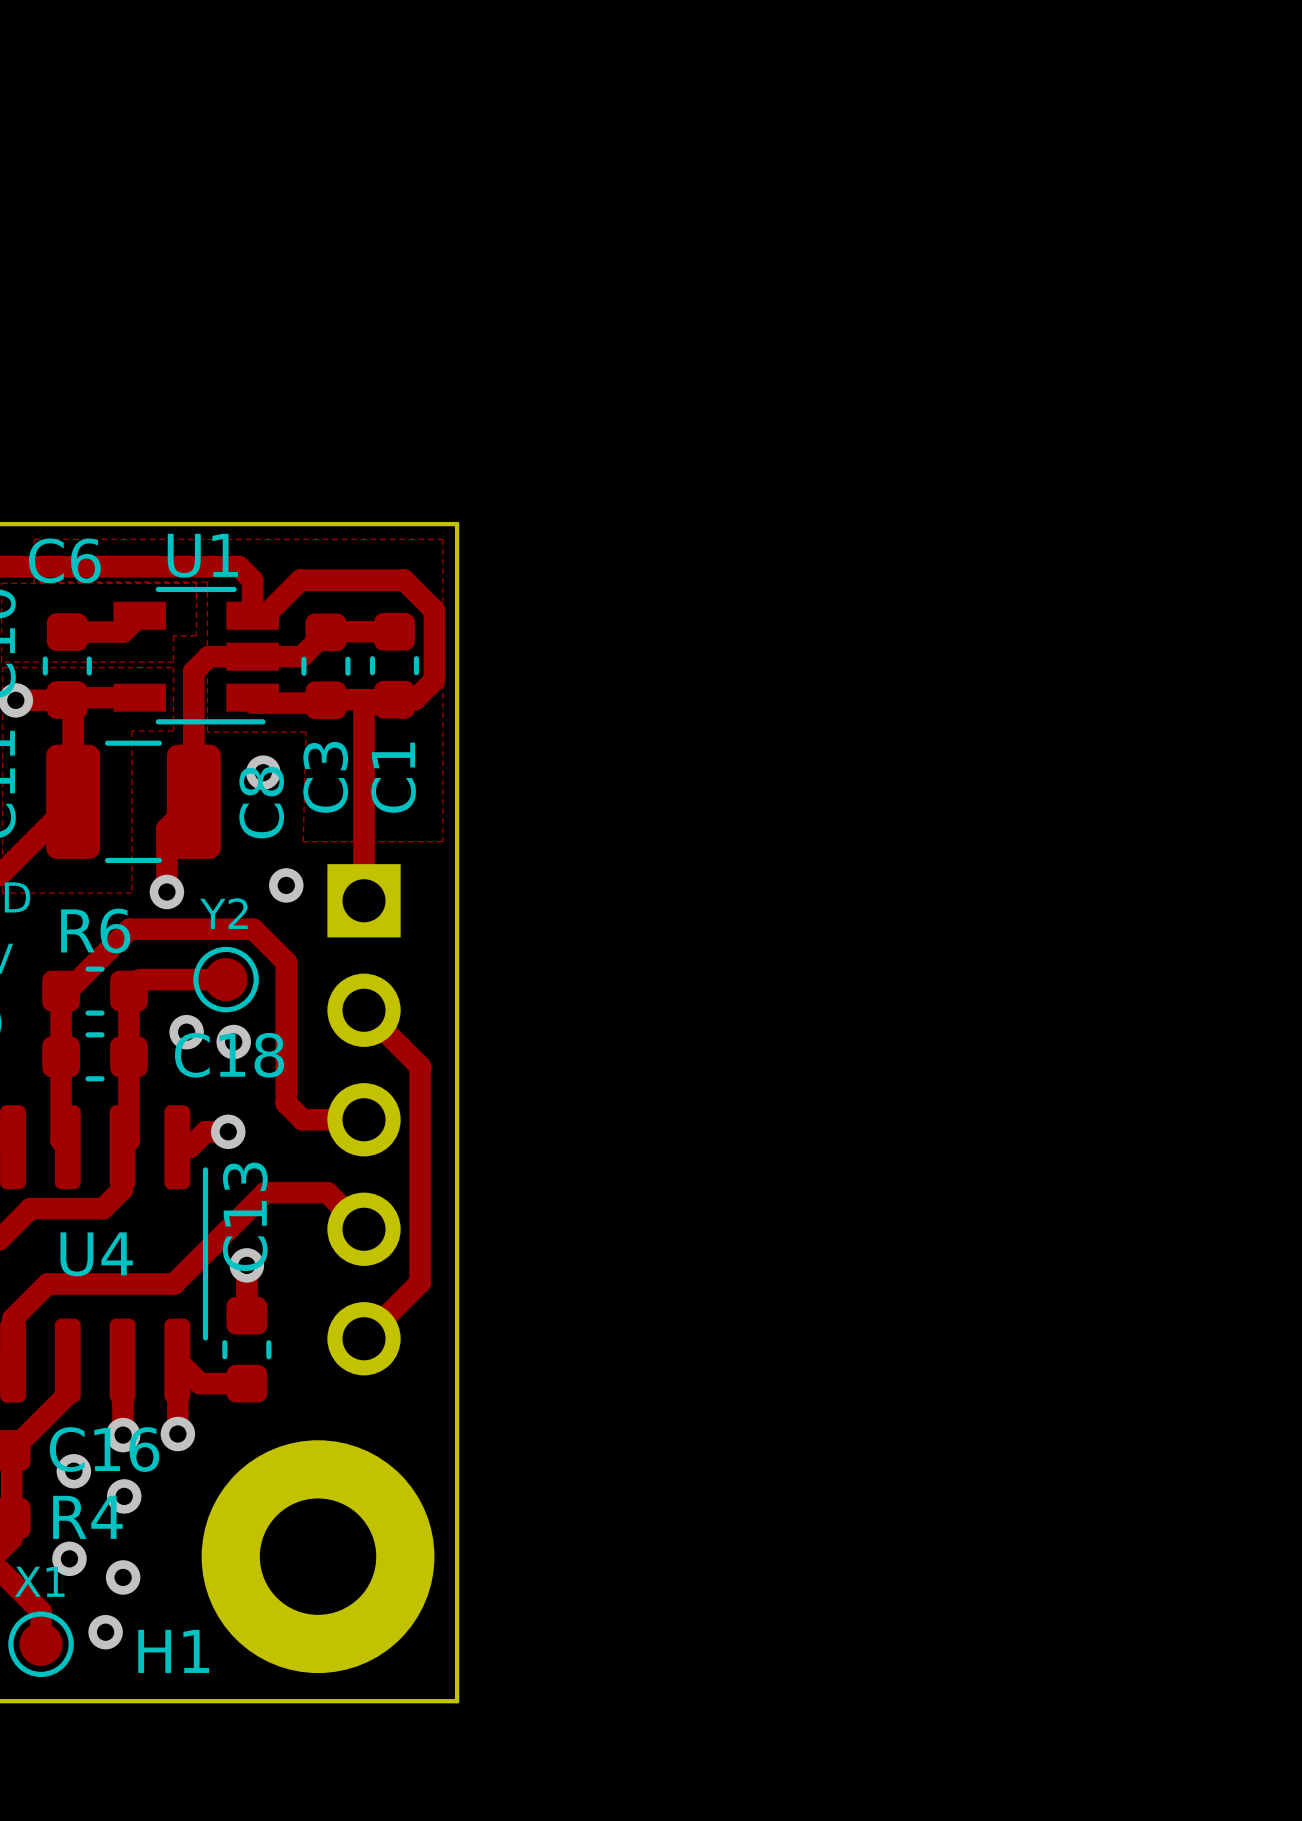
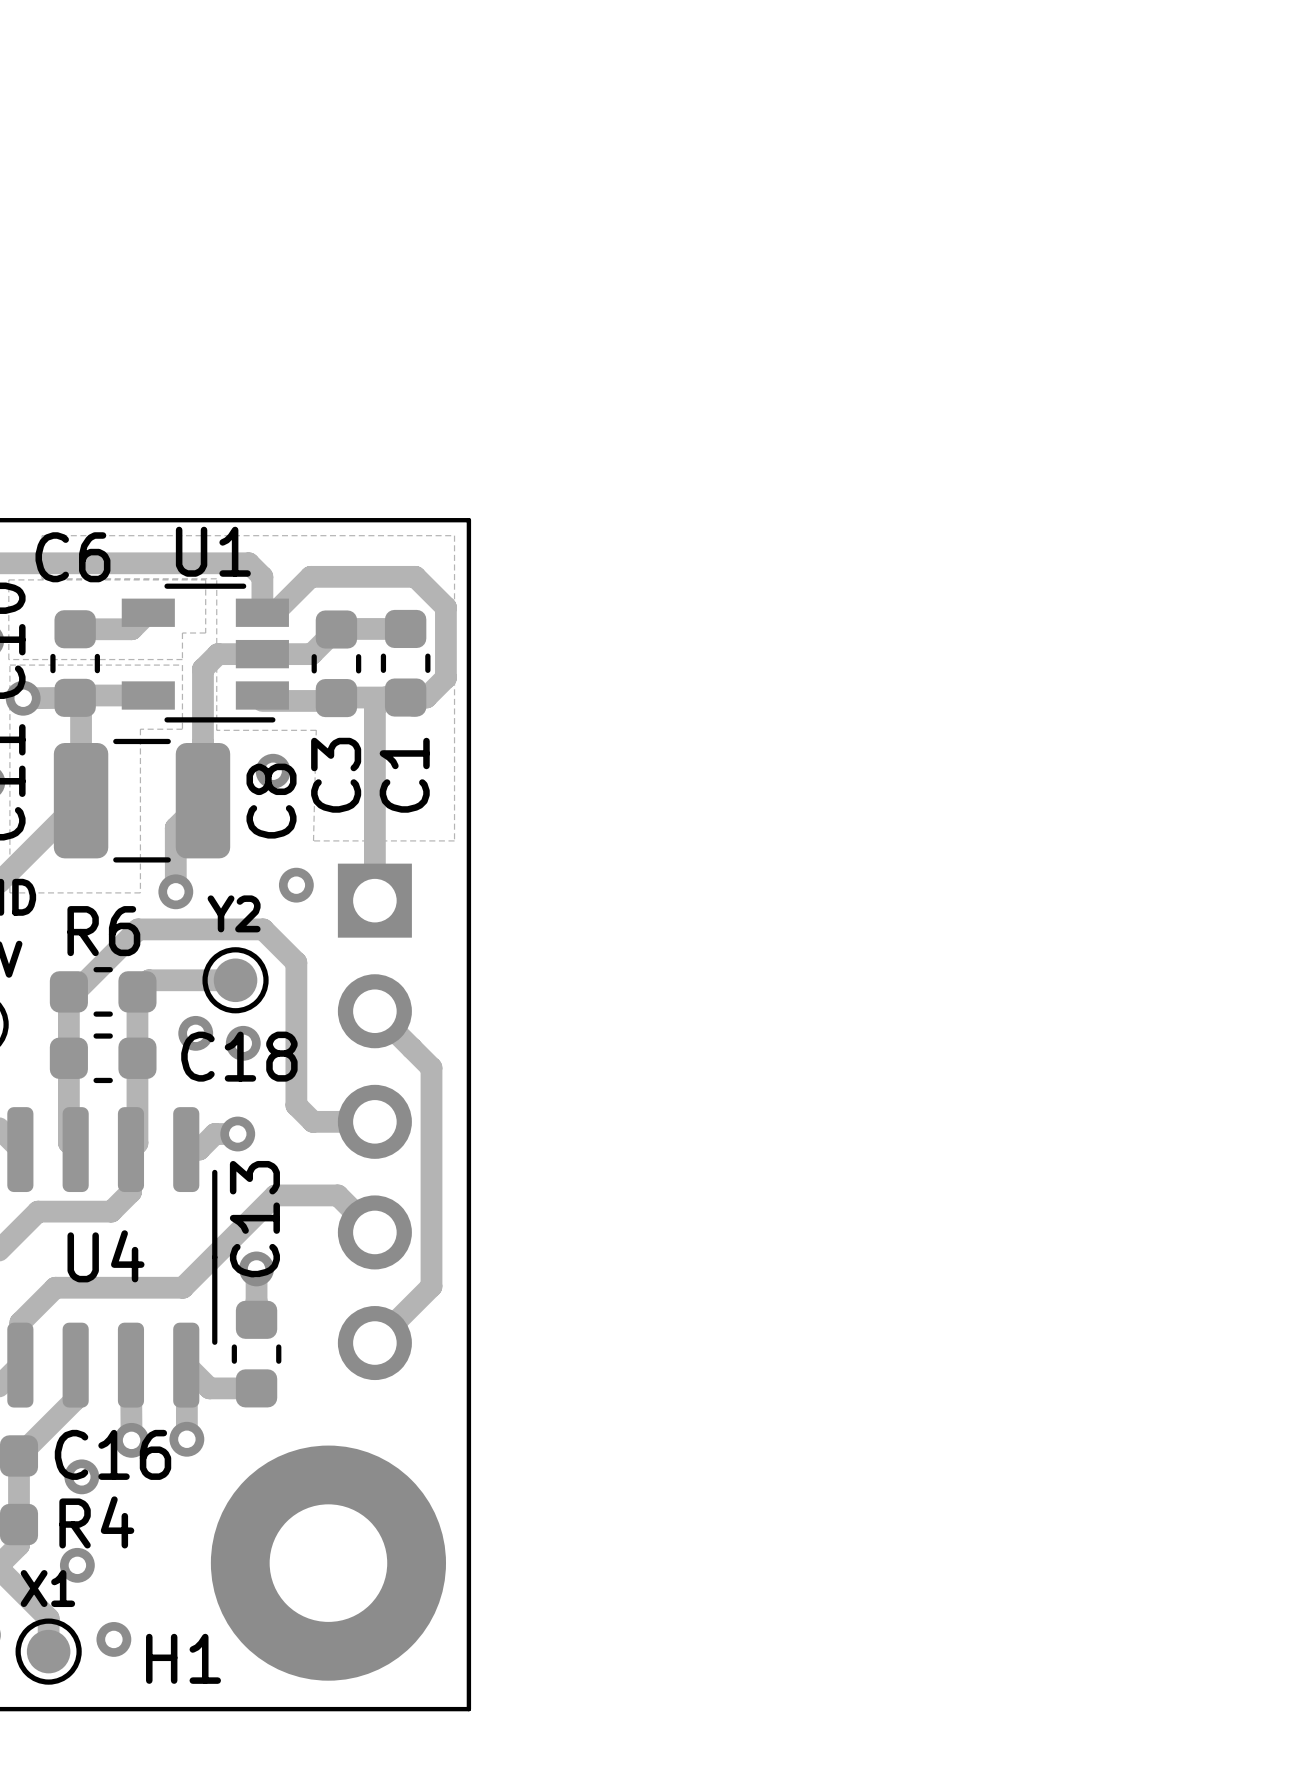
via: (124, 1496) -> none
via: (123, 1577) -> none

